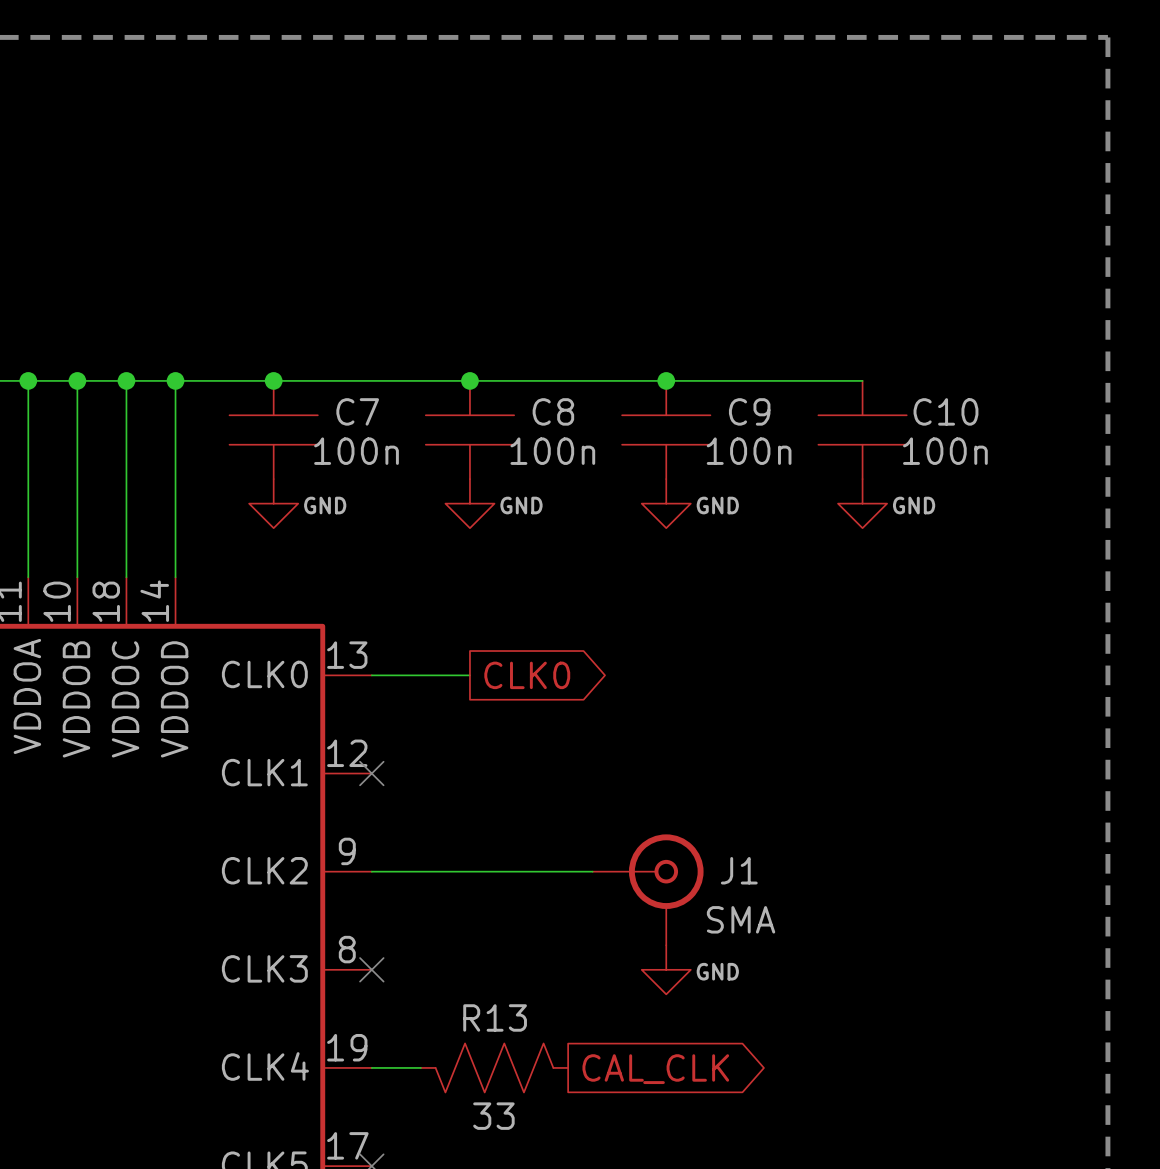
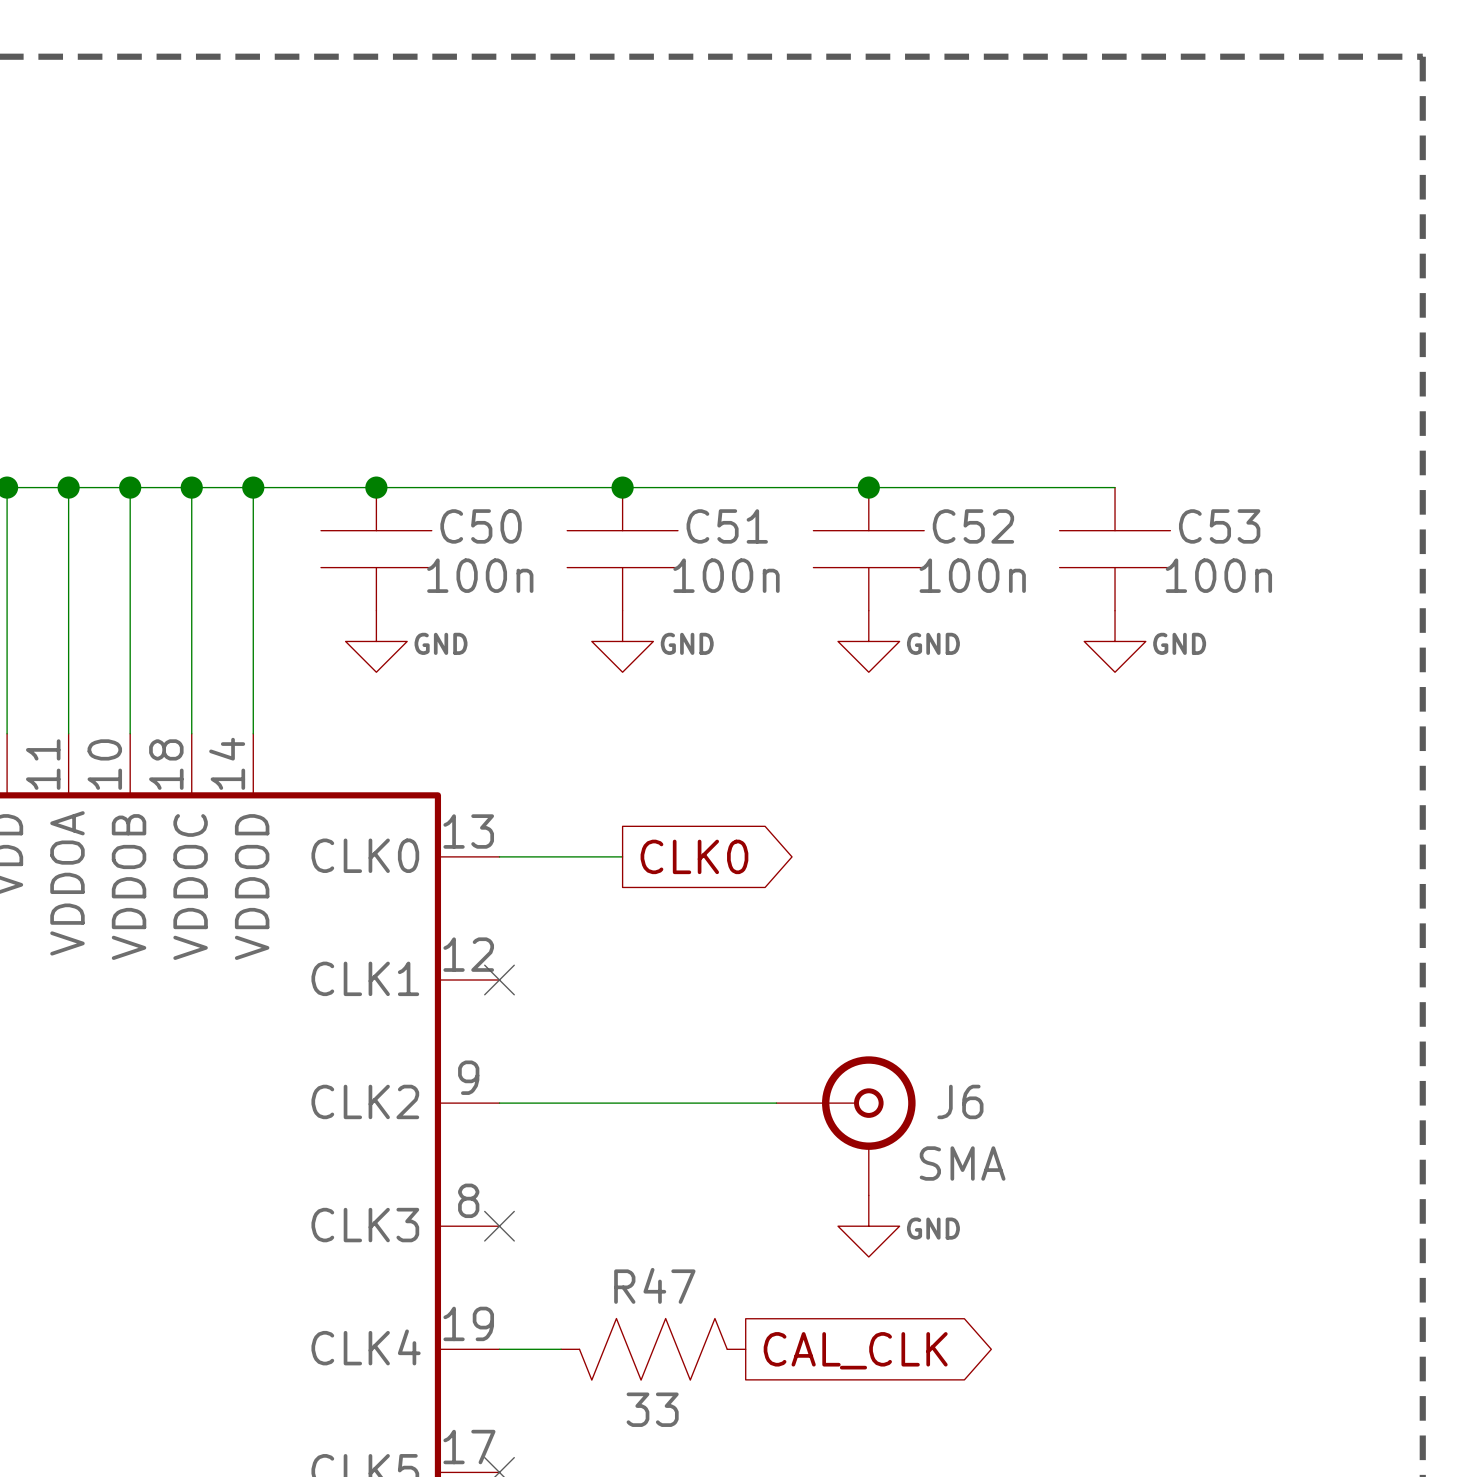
C7 name: C7 (357, 411) -> C50 (481, 526)
C8 name: C8 (553, 411) -> C51 (727, 526)
C9 name: C9 (749, 411) -> C52 (973, 526)
C10 name: C10 (945, 411) -> C53 (1219, 526)
J1 name: J1 (739, 870) -> J6 (960, 1101)
R13 name: R13 (495, 1017) -> R47 (654, 1285)

